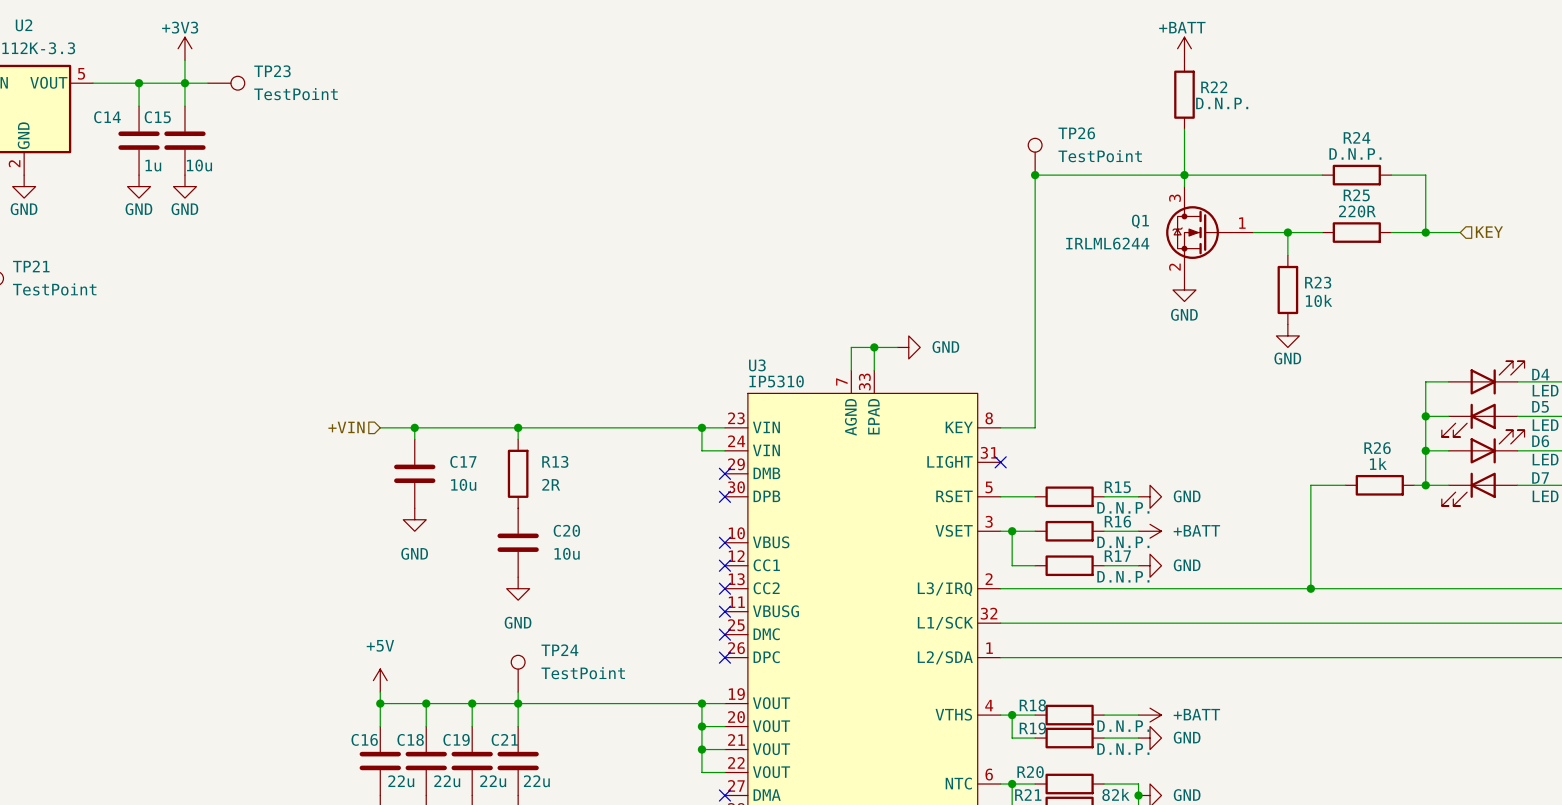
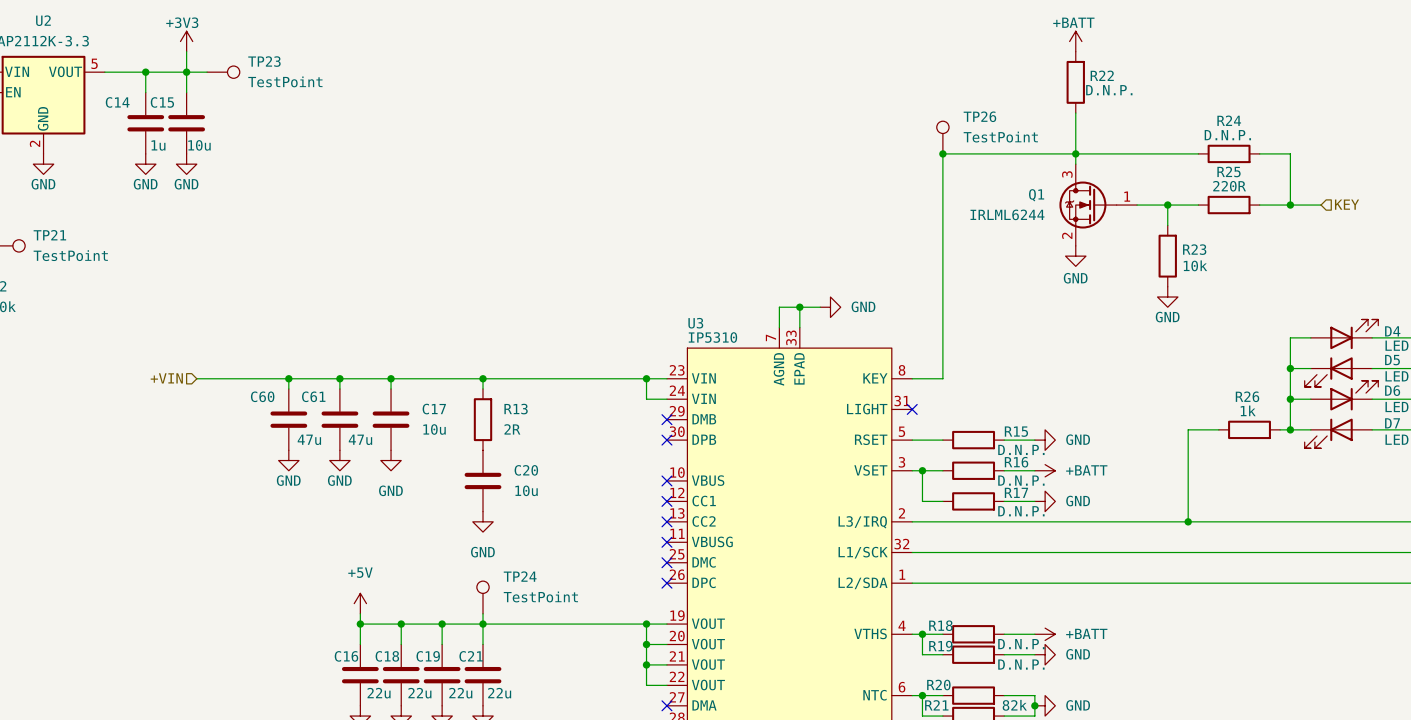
wire: none -> (196, 378) (360, 378)
wire: none -> (288, 378) (288, 388)
junction: none -> (288, 378)
hierarchical label position: +VIN (346, 427) -> +VIN (166, 378)
wire: none -> (339, 378) (339, 388)
junction: none -> (339, 378)
C60: none -> 47u (288, 419)
C61: none -> 47u (339, 419)
power symbol: none -> GND (288, 460)
power symbol: none -> GND (339, 460)

